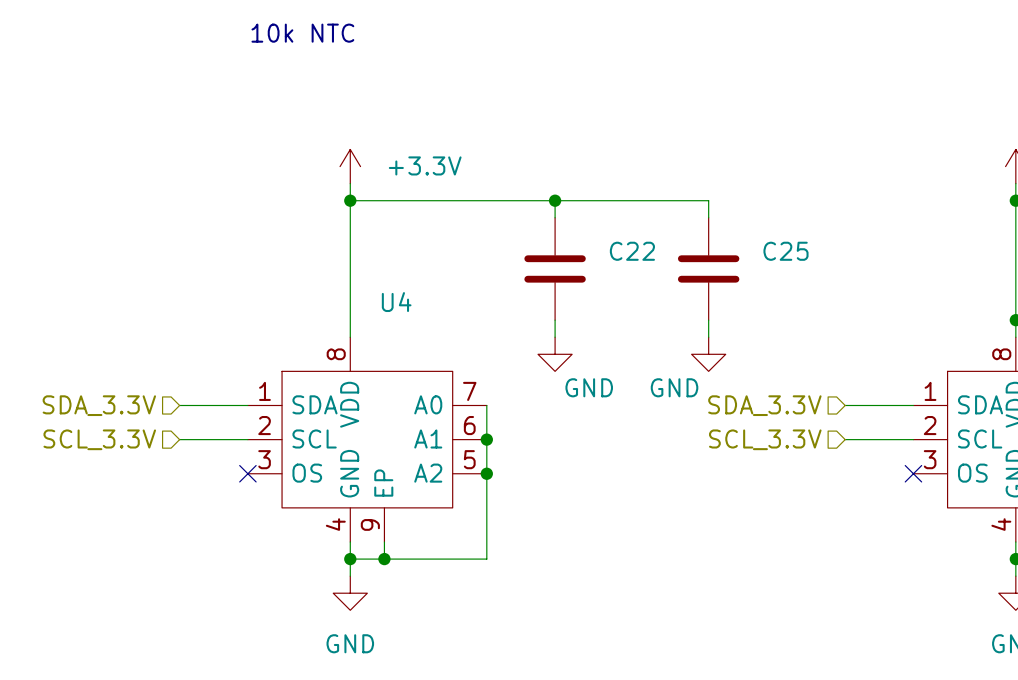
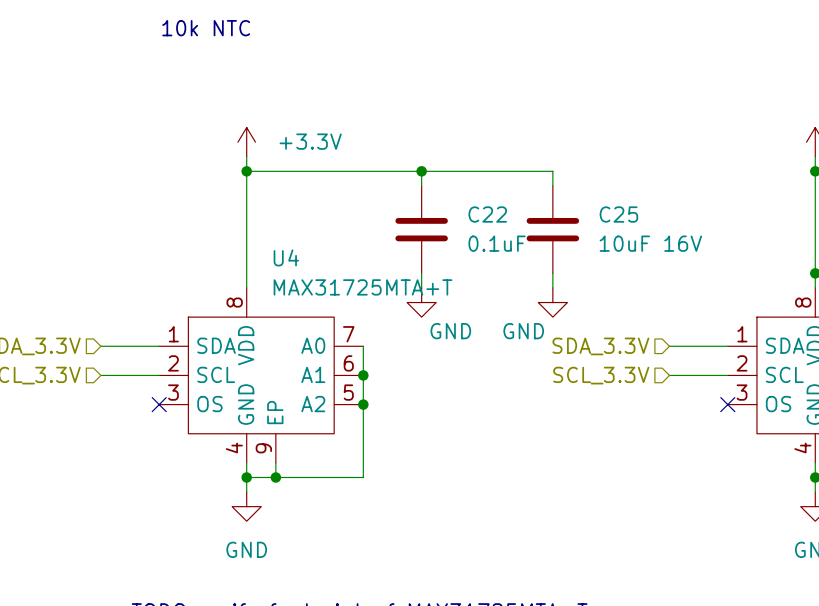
C22 value: none -> 0.1uF (497, 243)
C25 value: none -> 10uF 16V (650, 243)
U4 value: none -> MAX31725MTA+T (363, 287)

